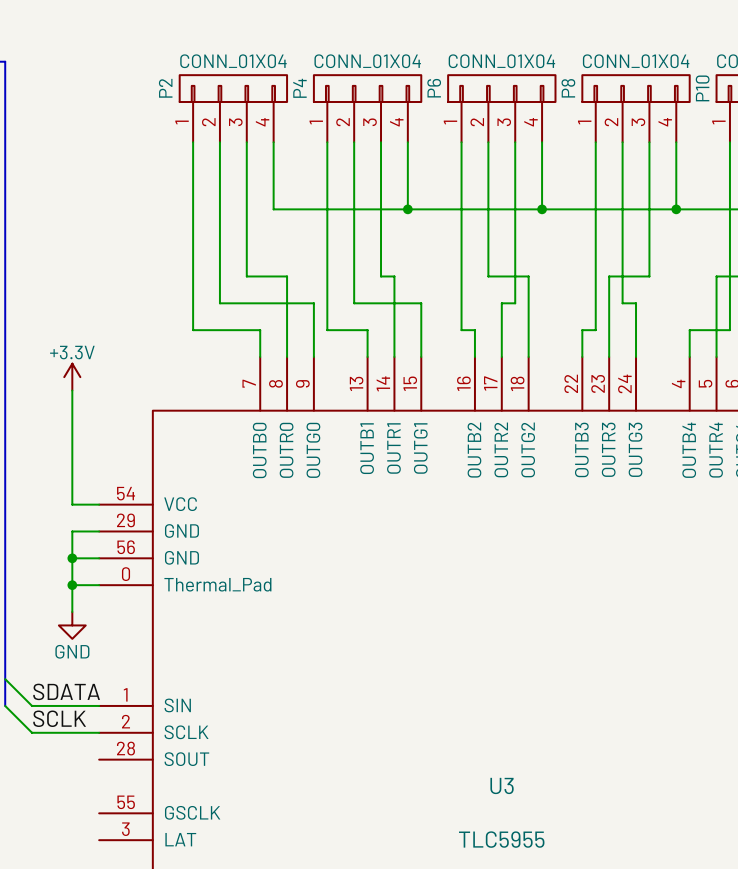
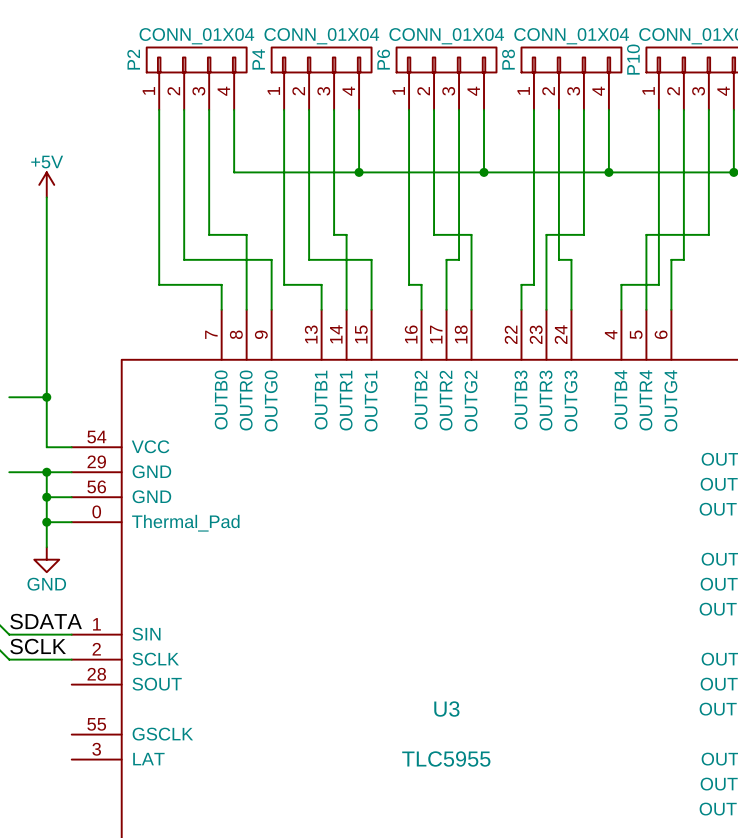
power symbol: none -> +5V (46, 184)
wire: none -> (46, 197) (46, 341)
power symbol: +3.3V (72, 377) -> none
wire: none -> (9, 397) (46, 397)
junction: none -> (46, 397)
wire: none -> (9, 472) (46, 472)
junction: none -> (46, 472)

